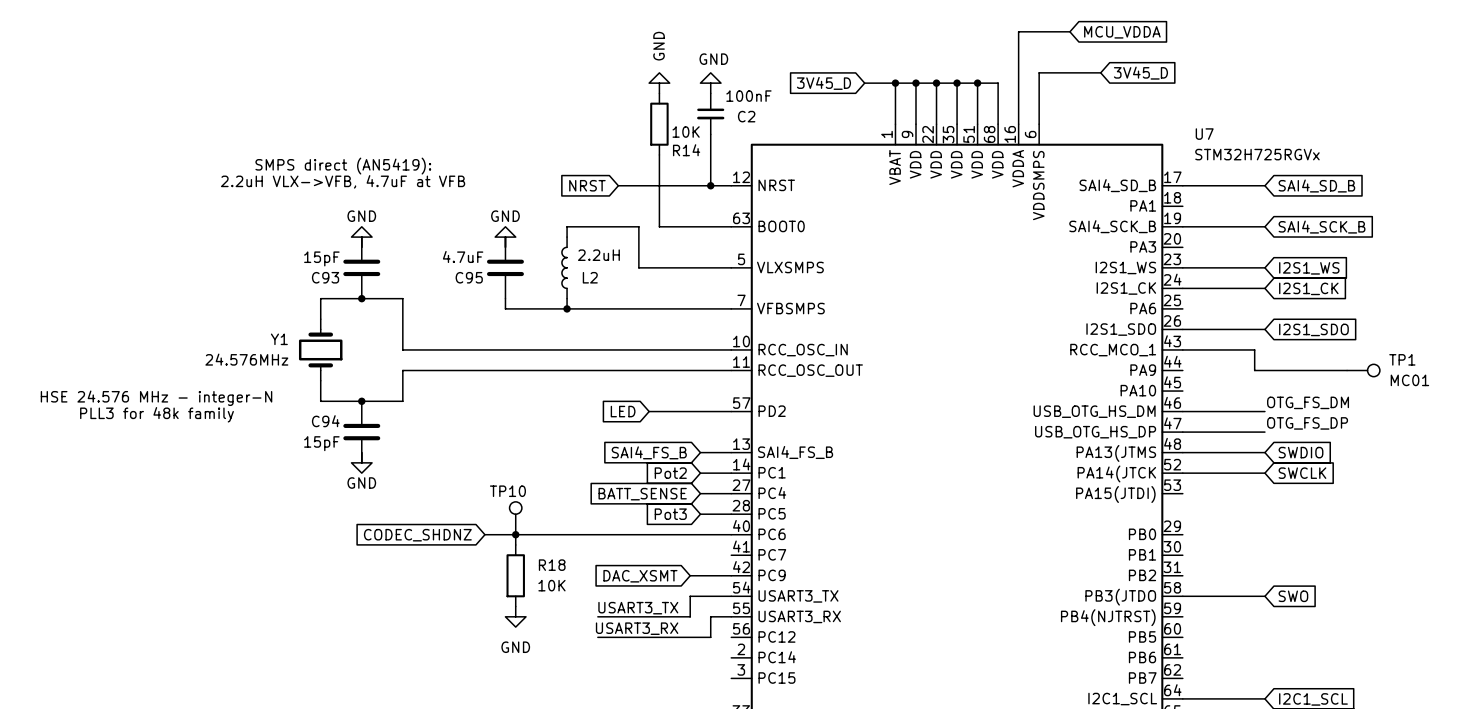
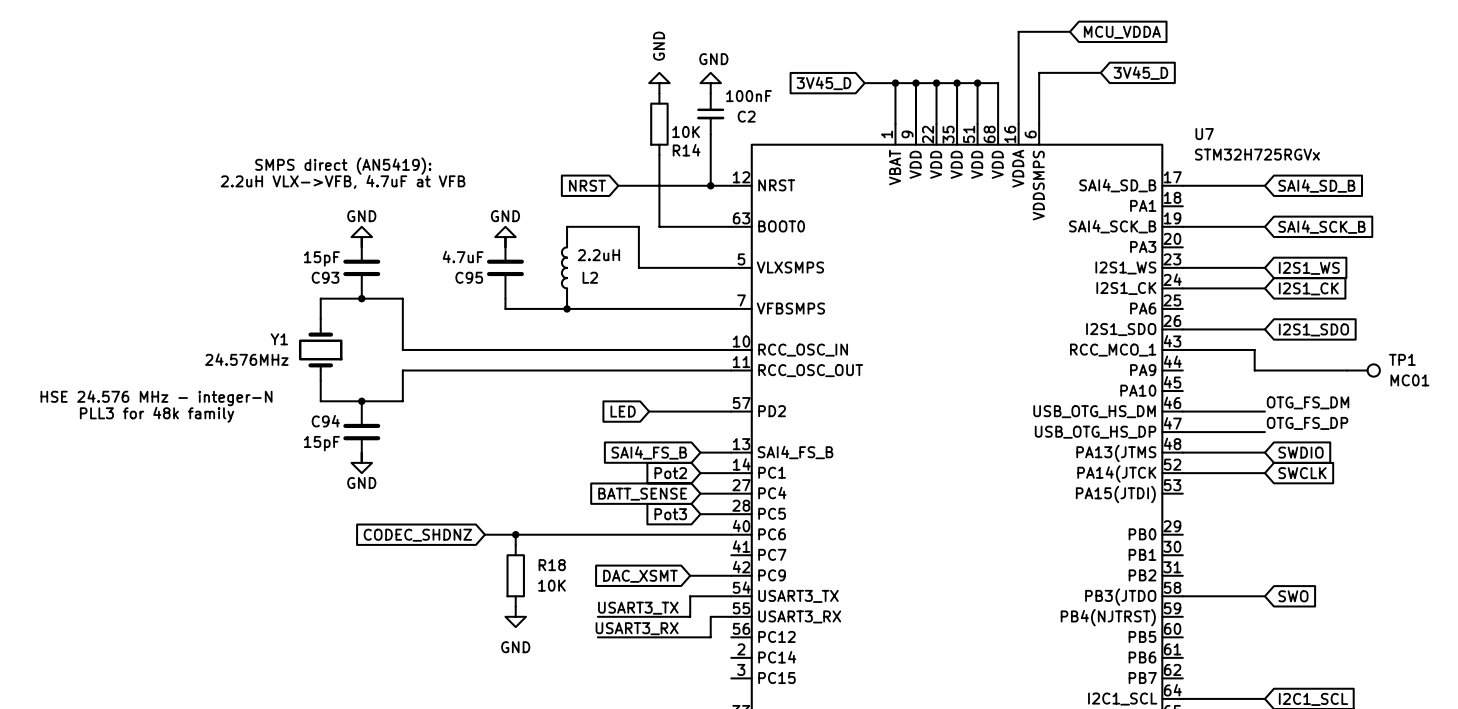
TP10: (515, 518) -> none

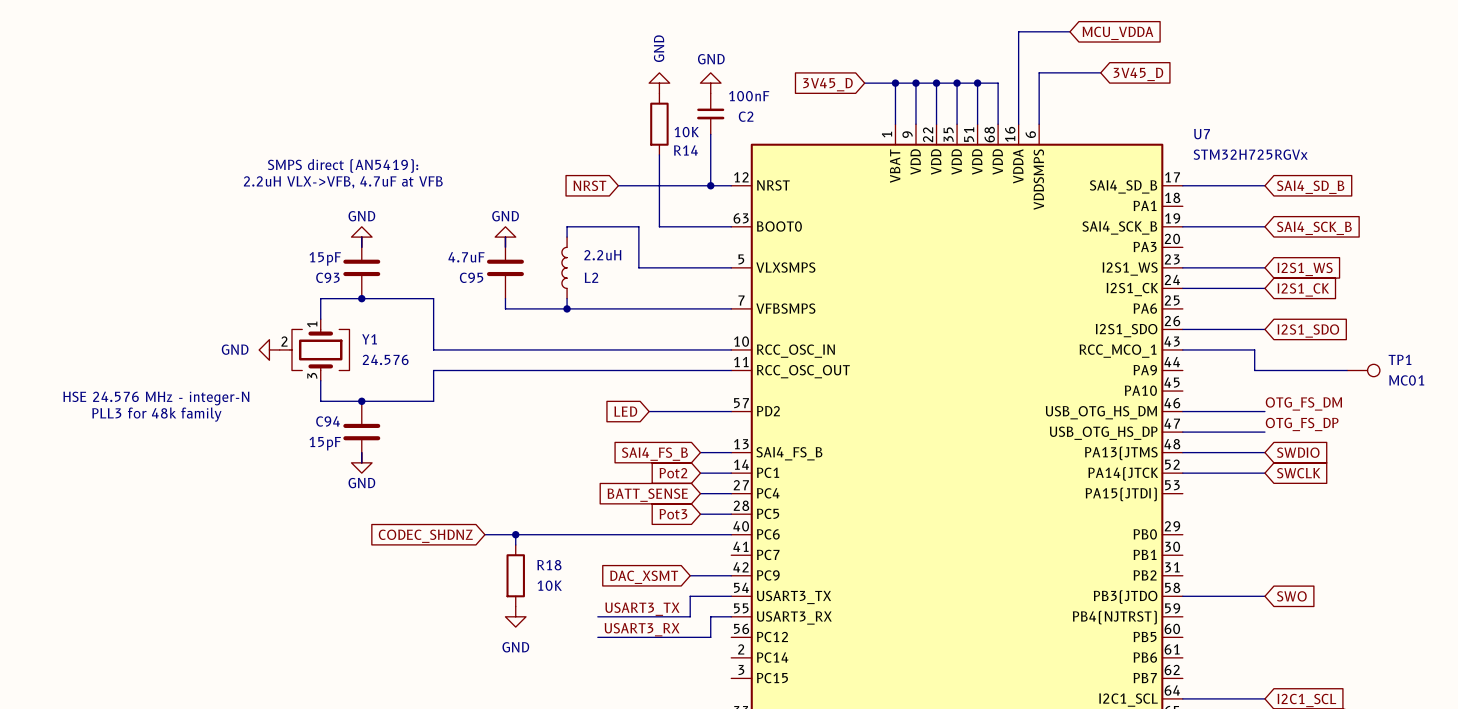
wire: (402, 298) (402, 349) (433, 349) -> (402, 298) (433, 298) (433, 349)
Y1 symbol: [298, 319, 343, 381] -> [279, 319, 350, 381]
Y1 name position: Y1 (279, 339) -> Y1 (369, 339)
power symbol: none -> GND (269, 349)
Y1 value: 24.576MHz (246, 359) -> 24.576 (385, 359)
wire: (433, 370) (402, 370) (402, 401) -> (433, 370) (433, 401) (402, 401)

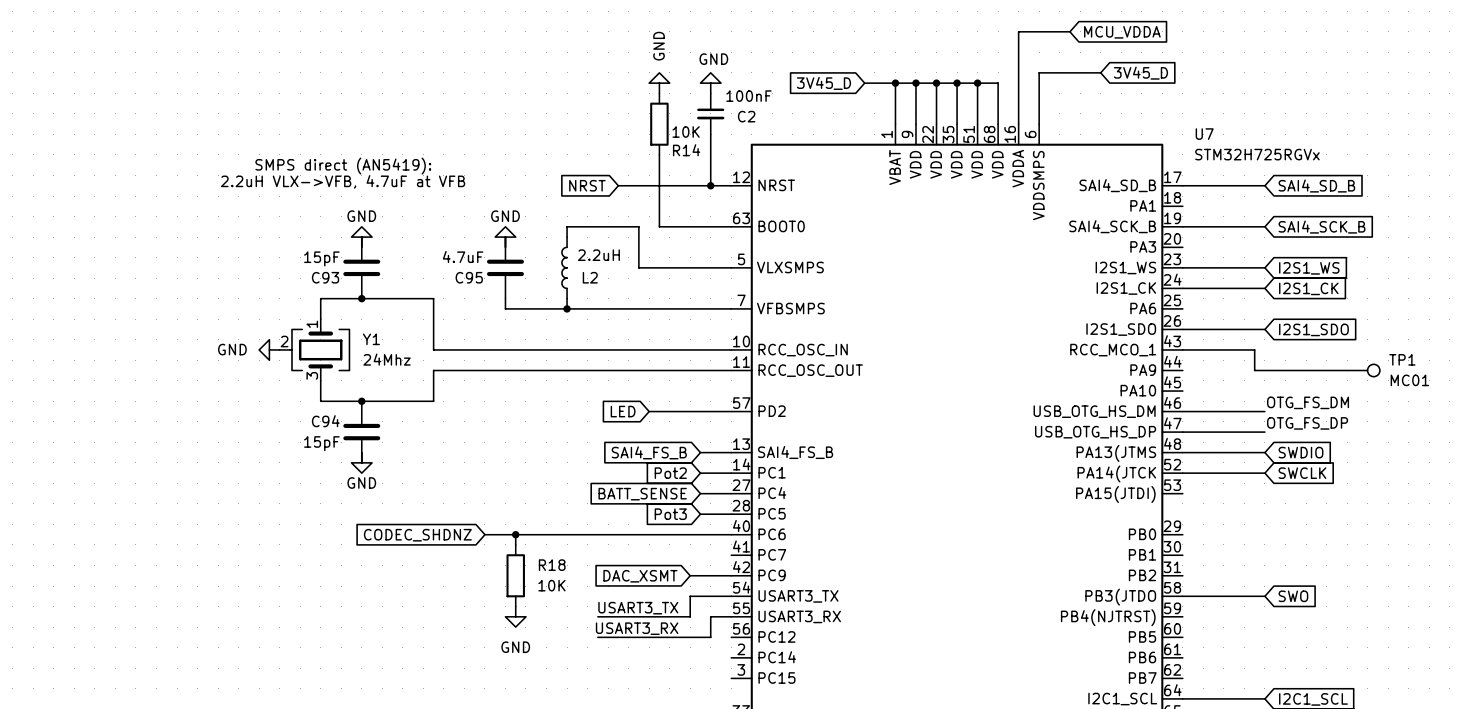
Y1 value: 24.576 (385, 359) -> 24Mhz (387, 359)
text: HSE 24.576 MHz - integer-N (156, 398) -> none
text: PLL3 for 48k family (156, 414) -> none

